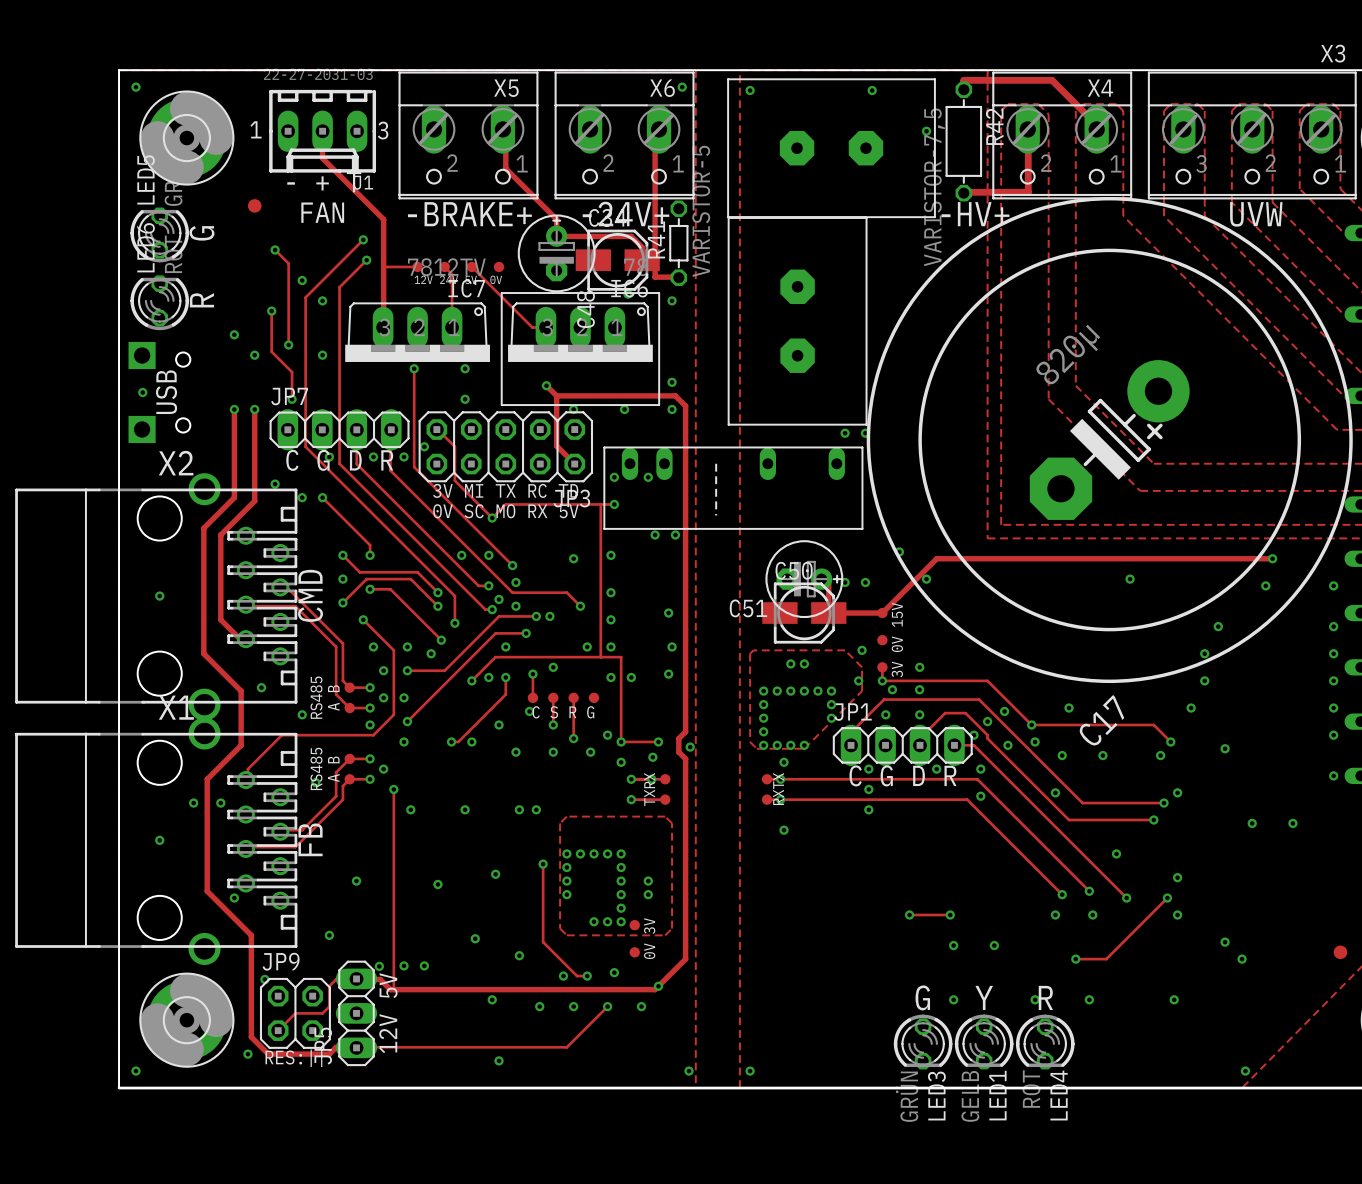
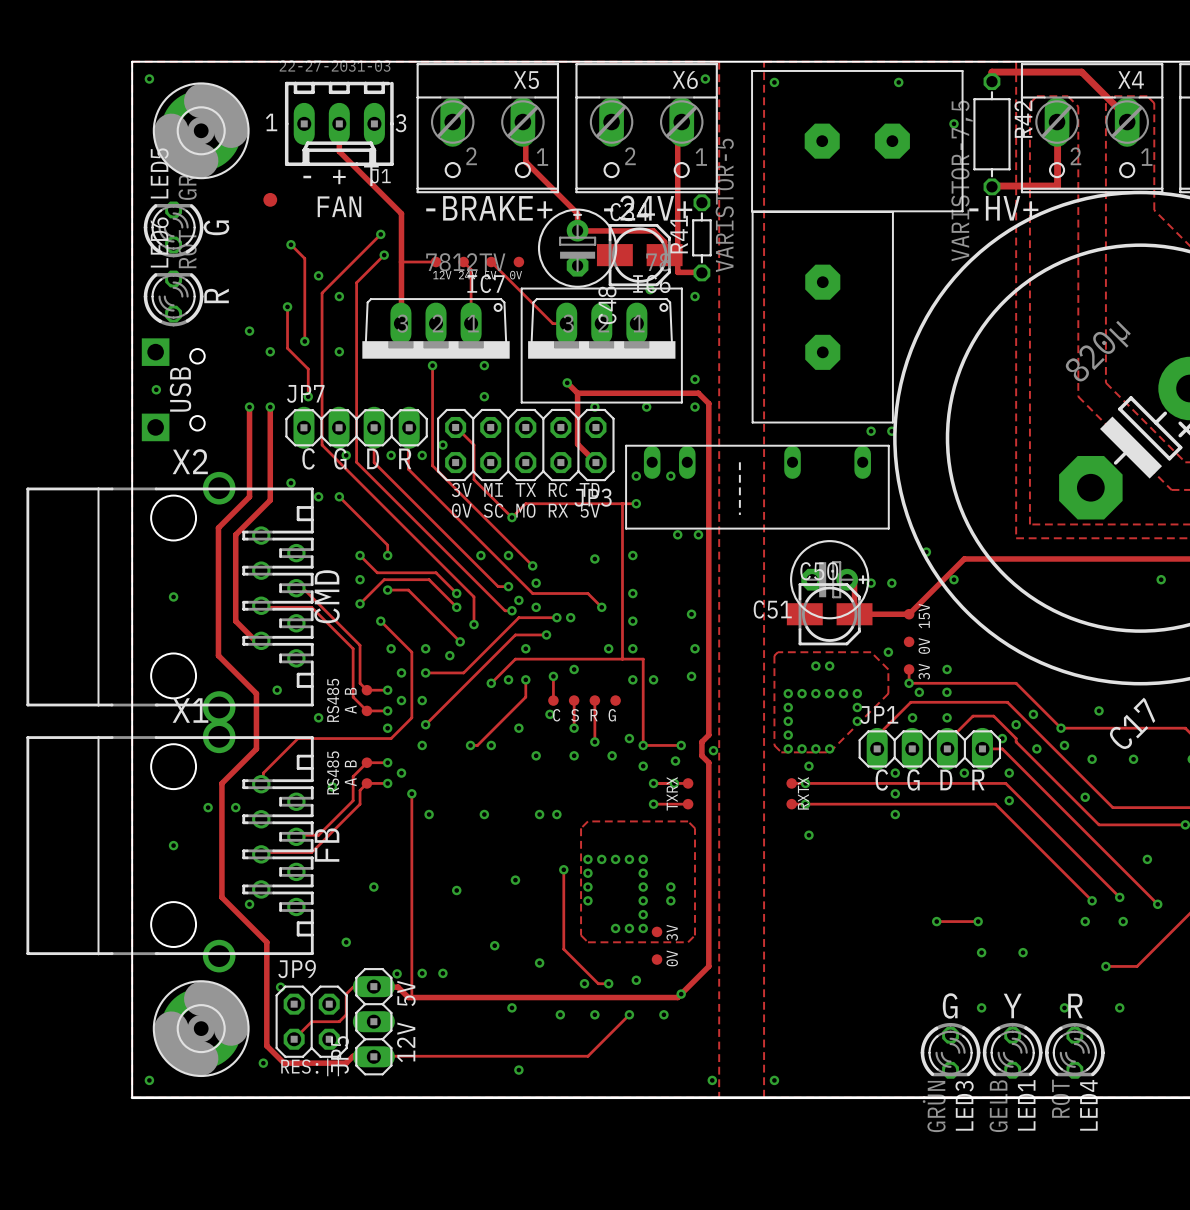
via: (858, 680) -> none

